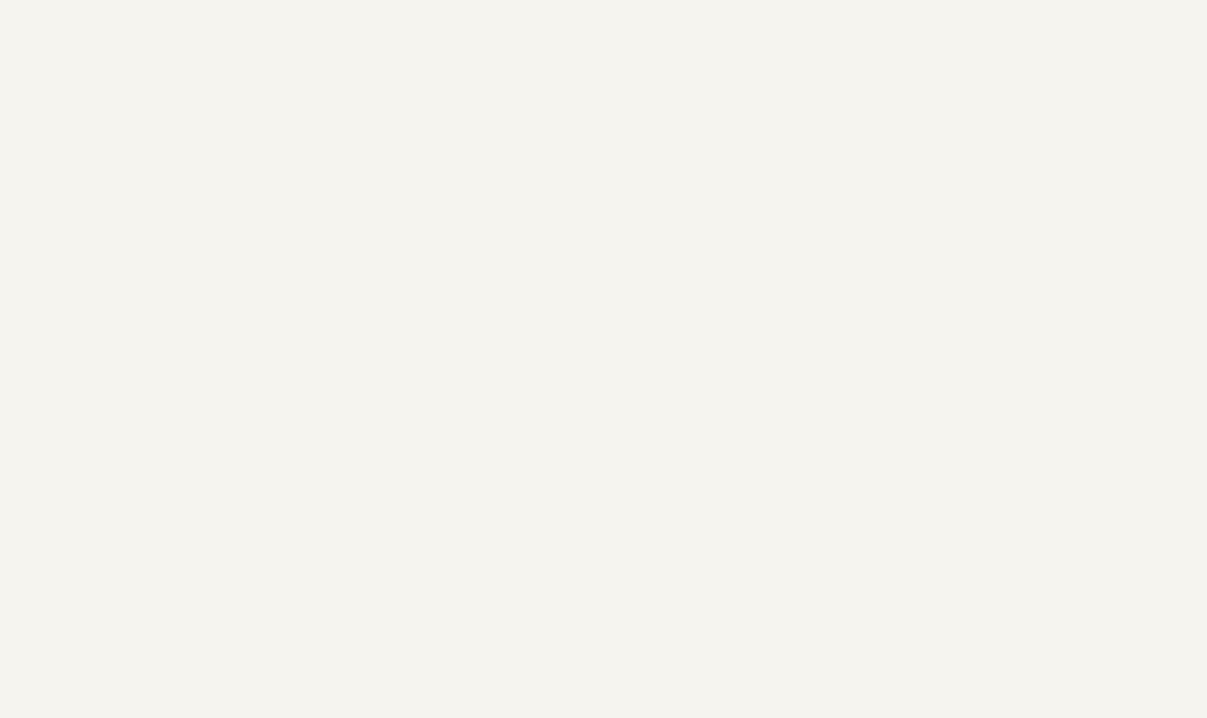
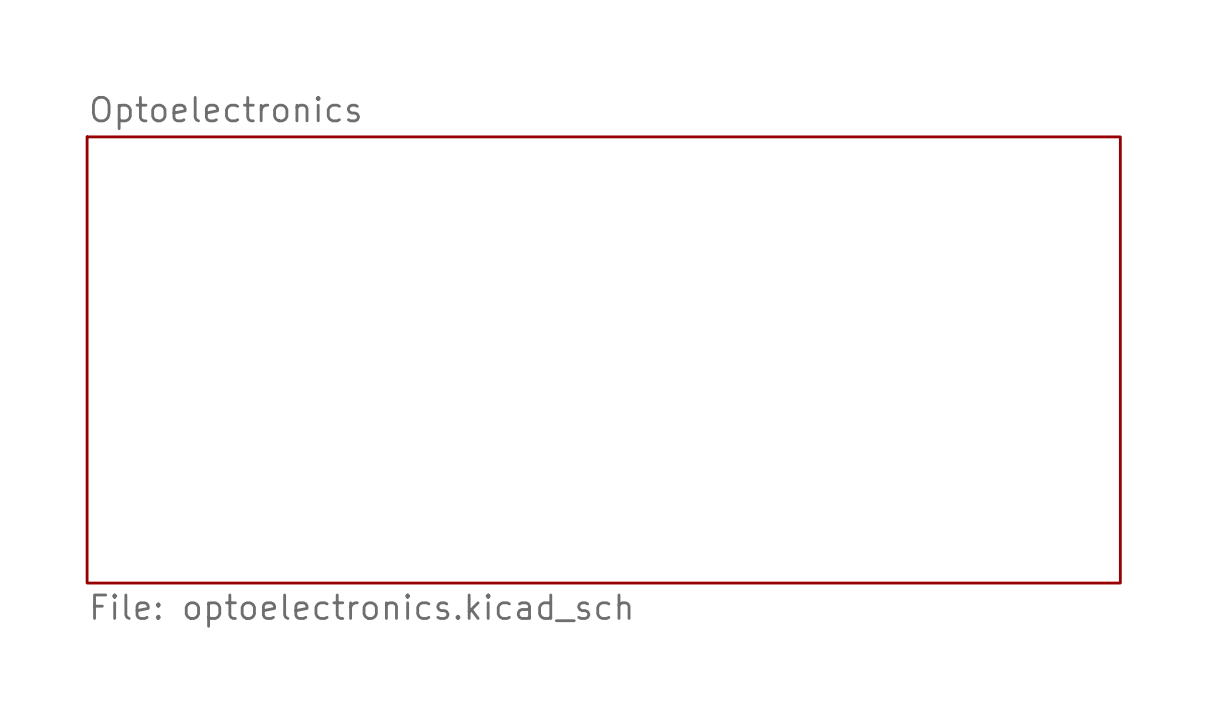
sheet Optoelectronics: none -> File: optoelectronics.kicad_sch (603, 359)

